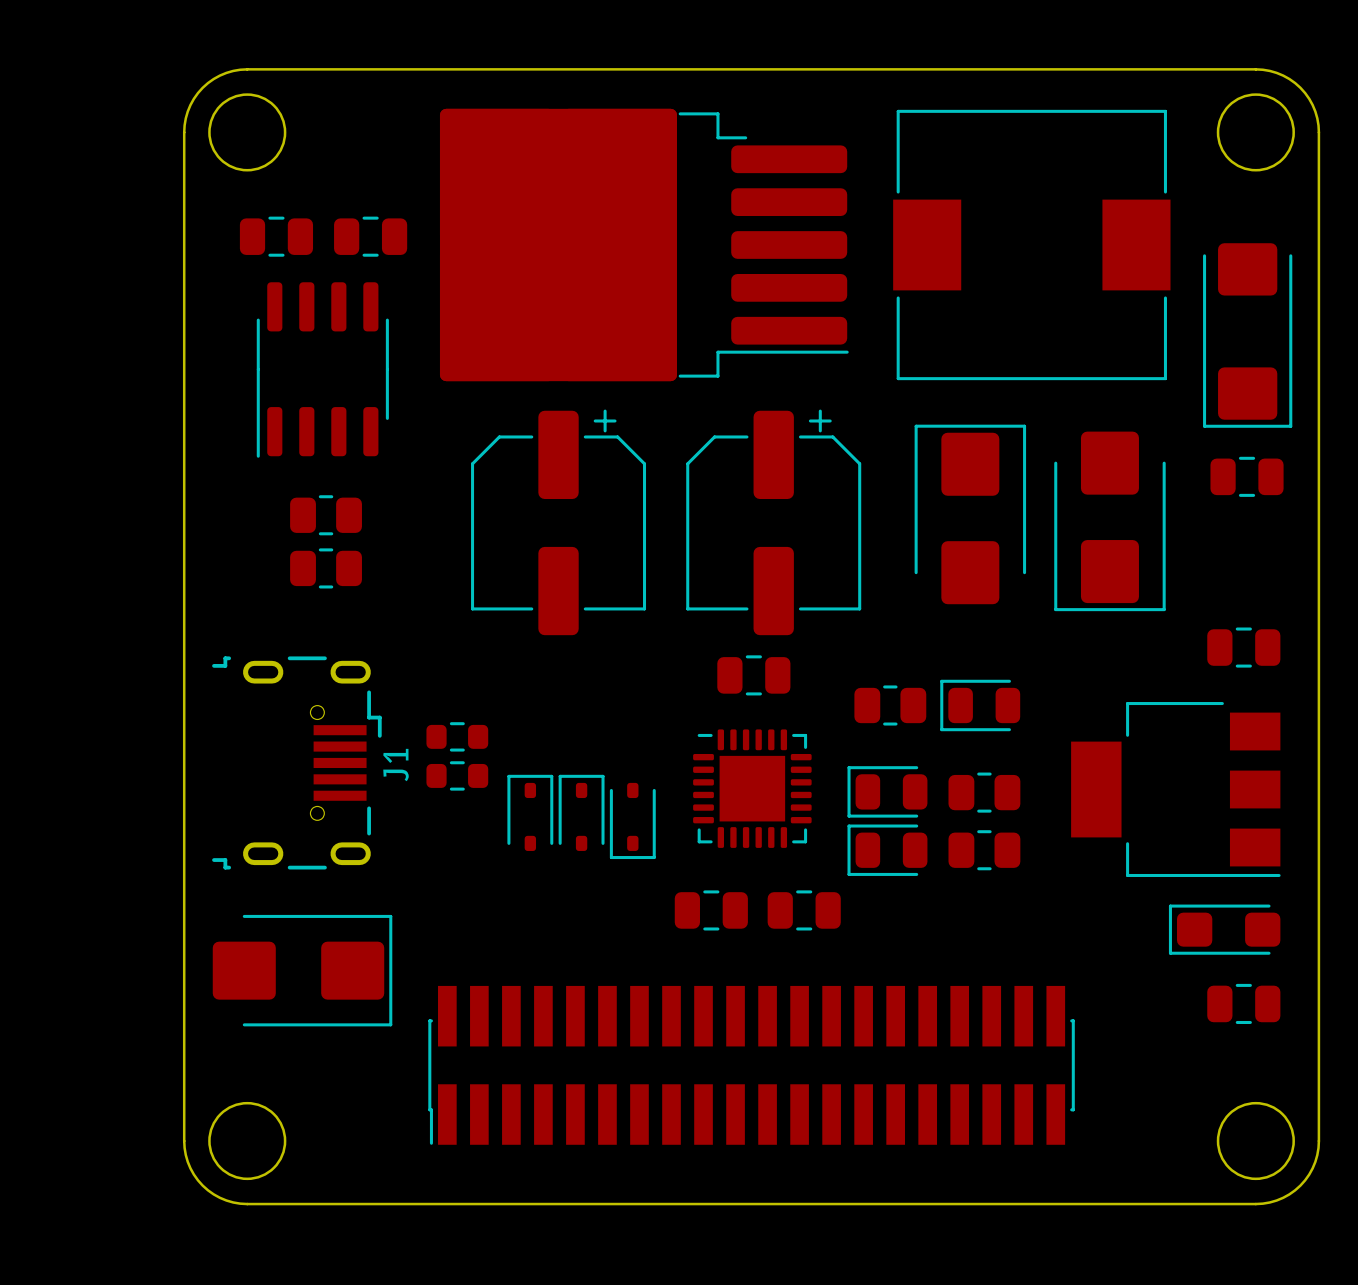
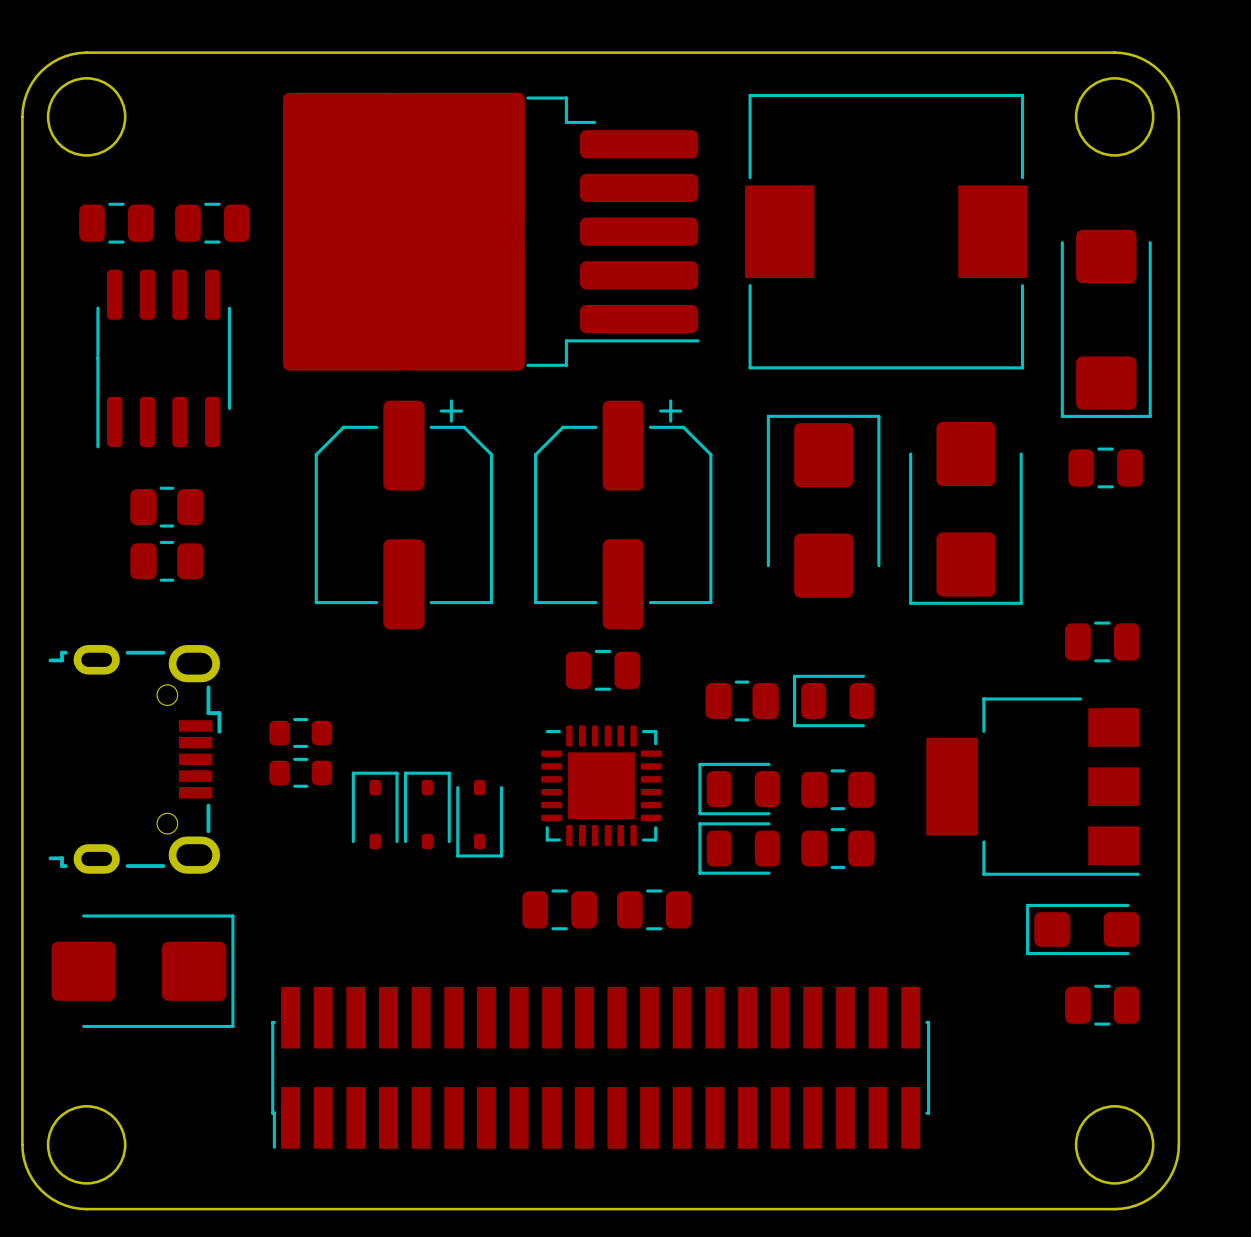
part: none -> (134, 759)
J1: (296, 762) -> none

